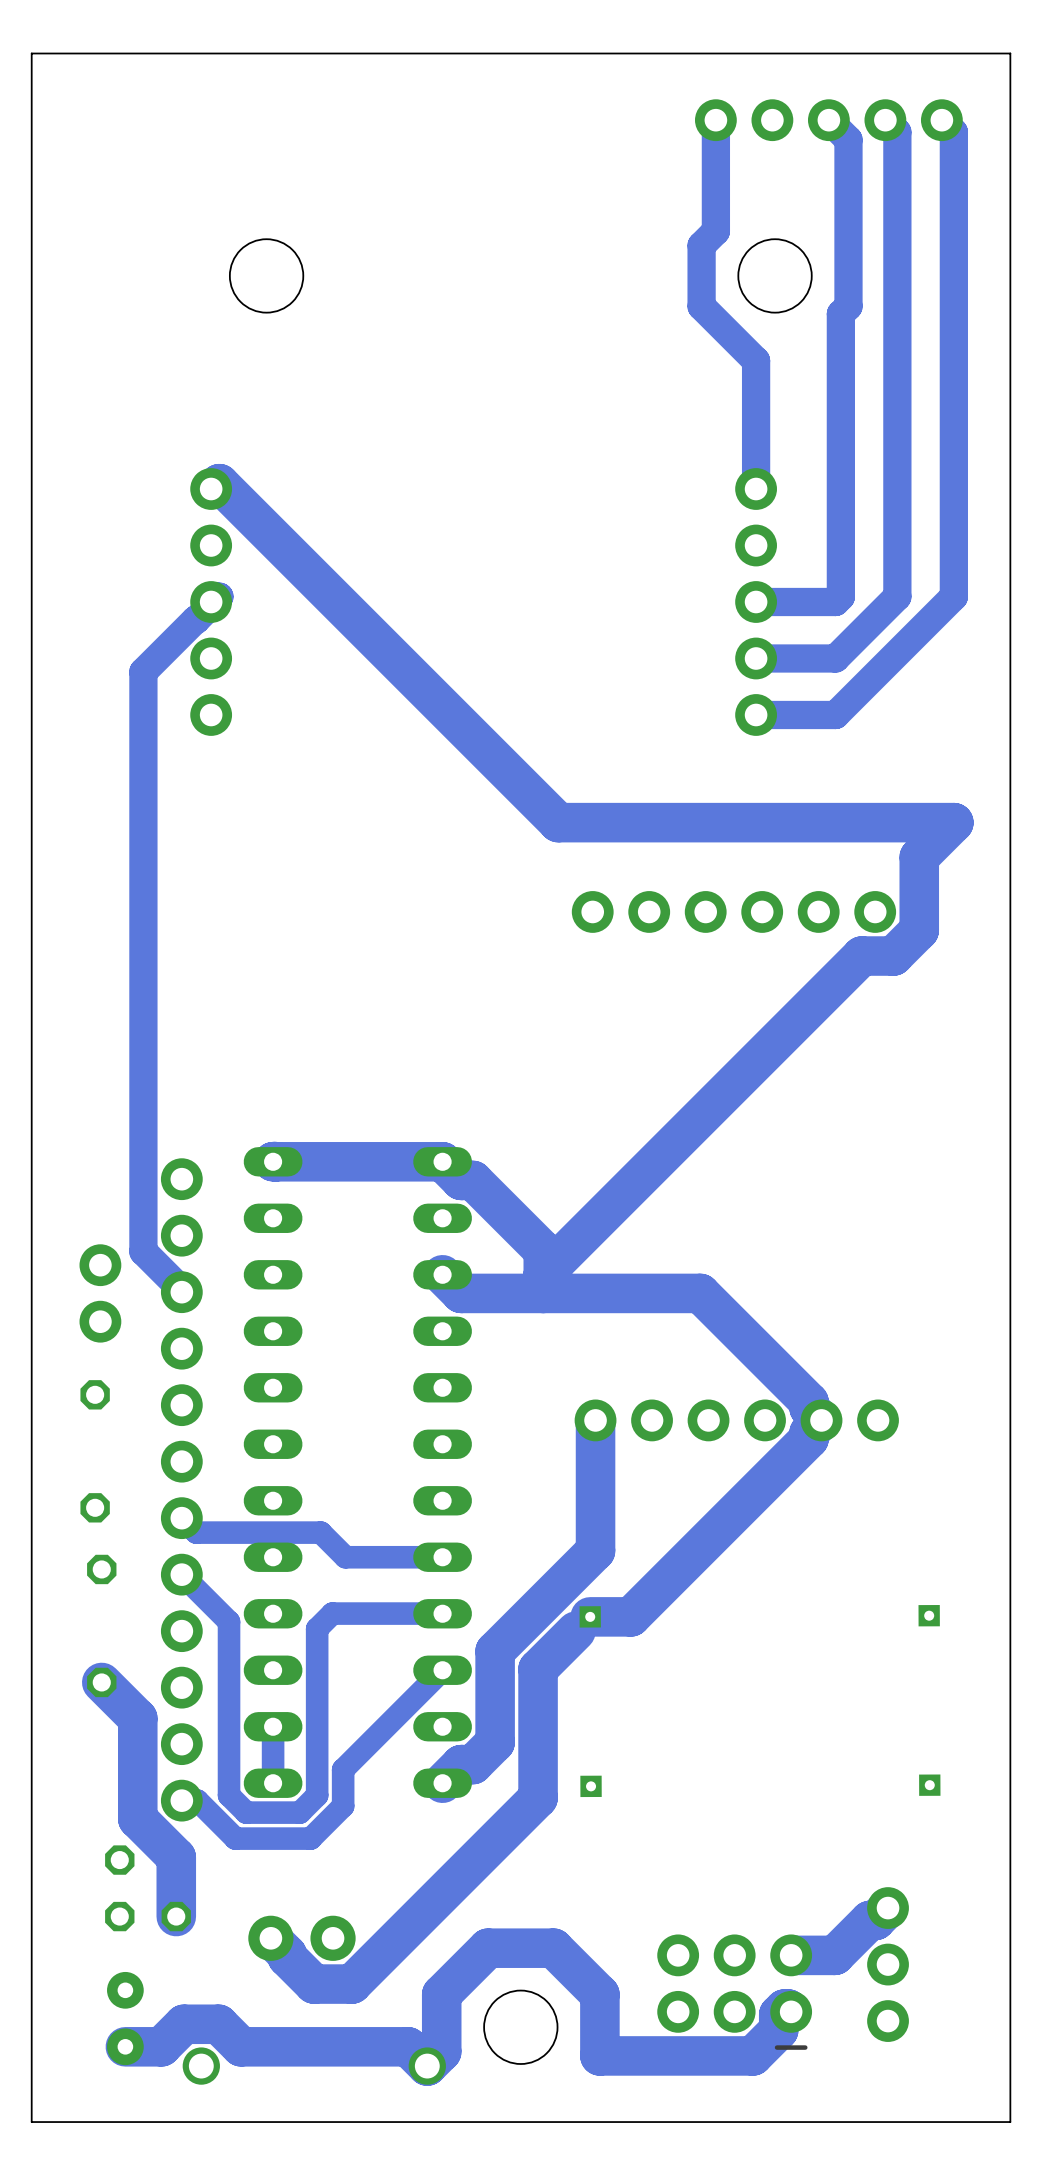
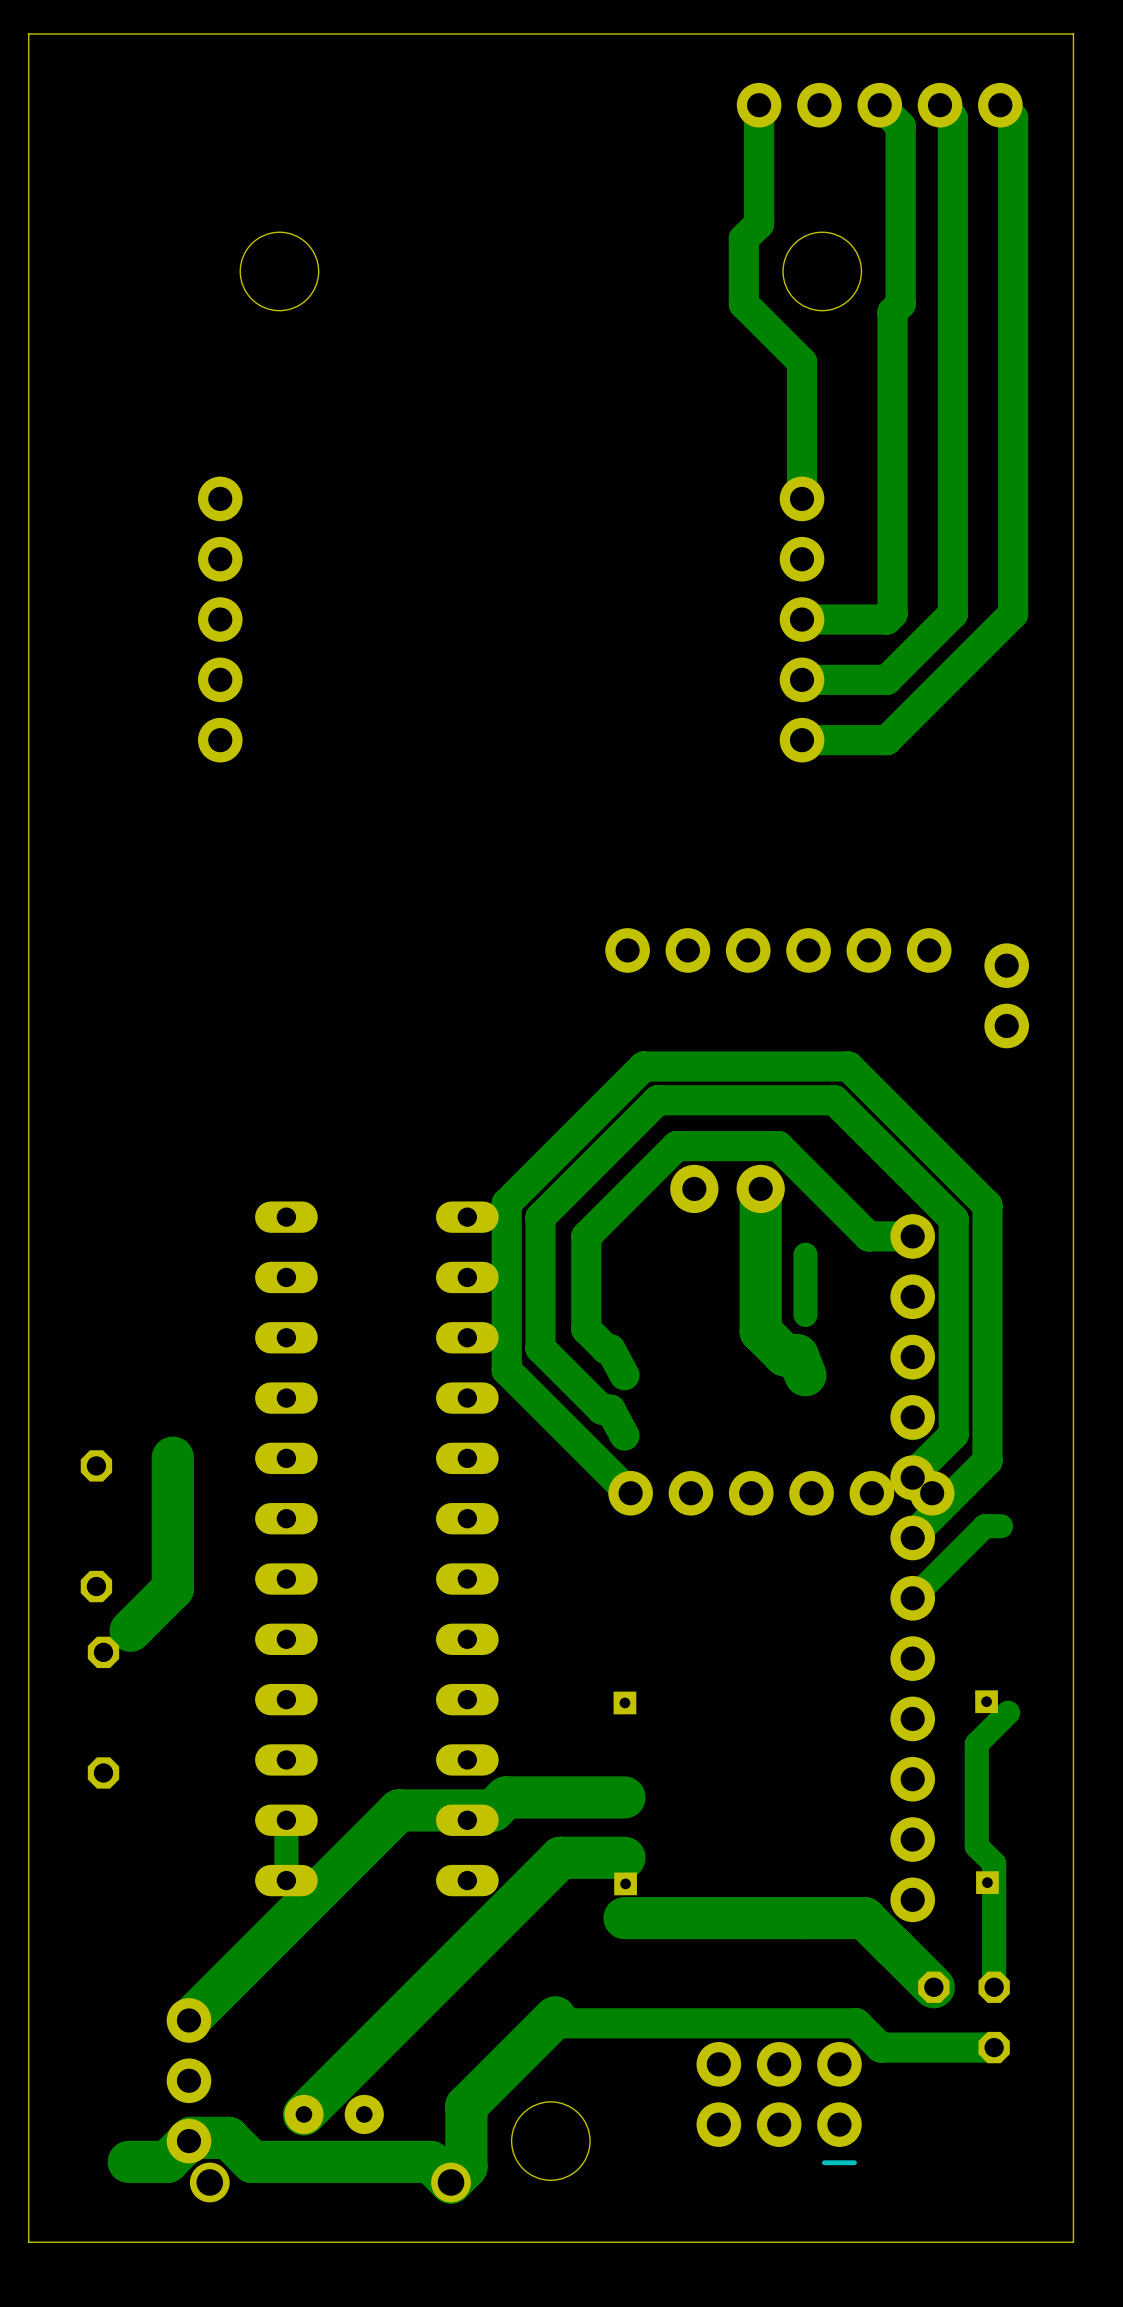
track: (211, 489) (214, 489) (219, 483) (558, 822) (953, 822) (919, 857) (919, 930) (893, 956) (861, 956) (543, 1274) -> none
track: (211, 602) (216, 596) (219, 596) (143, 671) (143, 1251) (181, 1292) -> none
part: none -> (1006, 995)
part: none -> (727, 1188)
track: none -> (760, 1188) (760, 1331) (784, 1355) (797, 1355) (805, 1375)
track: (276, 1161) (442, 1161) (461, 1180) (472, 1180) (543, 1250) (543, 1293) -> none
track: none -> (912, 1236) (868, 1236) (778, 1146) (676, 1146) (586, 1236) (586, 1329) (606, 1349) (610, 1349) (624, 1375)
track: none -> (805, 1254) (805, 1314)
track: (442, 1274) (461, 1293) (700, 1293) (809, 1402) (809, 1407) (821, 1420) (809, 1432) (809, 1438) (630, 1616) (590, 1616) -> none
part: (100, 1293) -> none
track: none -> (624, 1435) (610, 1409) (601, 1409) (540, 1348) (540, 1217) (657, 1100) (834, 1100) (953, 1219) (953, 1434) (912, 1475) (912, 1479)
track: none -> (172, 1457) (172, 1588) (130, 1630)
track: (595, 1420) (595, 1550) (495, 1651) (495, 1742) (472, 1764) (461, 1764) (442, 1783) -> none
track: none -> (624, 1495) (632, 1495) (506, 1370) (506, 1203) (643, 1066) (848, 1066) (987, 1205) (987, 1460) (912, 1535) (912, 1537)
track: none -> (1001, 1526) (984, 1526) (912, 1598)
part: (181, 1489) -> none
part: none -> (912, 1568)
track: (181, 1518) (196, 1532) (320, 1532) (345, 1557) (442, 1557) -> none
track: (181, 1574) (229, 1621) (229, 1795) (246, 1812) (299, 1812) (317, 1795) (317, 1628) (332, 1613) (442, 1613) -> none
track: none -> (1008, 1712) (976, 1744) (976, 1846) (994, 1863) (994, 1987)
track: (575, 1631) (538, 1669) (538, 1798) (351, 1984) (314, 1984) (270, 1938) -> none
track: (442, 1670) (343, 1769) (343, 1806) (310, 1838) (235, 1838) (197, 1800) (181, 1800) -> none
track: (101, 1682) (137, 1718) (137, 1818) (176, 1857) (176, 1916) -> none
track: none -> (624, 1797) (506, 1797) (493, 1810) (398, 1810) (188, 2020)
track: none -> (624, 1857) (560, 1857) (303, 2114)
track: none -> (624, 1918) (864, 1918) (893, 1946)
track: none -> (893, 1946) (933, 1987)
part: (148, 1888) -> none
track: (888, 1908) (875, 1920) (869, 1920) (834, 1955) (791, 1955) -> none
part: none -> (964, 2017)
part: (301, 1938) -> none
track: (488, 1948) (553, 1948) (599, 1994) (599, 2055) (752, 2055) (778, 2030) (778, 2014) (784, 2009) (788, 2009) (791, 2011) -> (515, 2056) (555, 2017) (561, 2023) (856, 2023) (880, 2047) (994, 2047)
part: (888, 1964) -> none
part: none -> (188, 2080)
part rotation: 0° (125, 2018) -> 90° clockwise (334, 2114)
part position: (125, 2018) -> (334, 2114)

